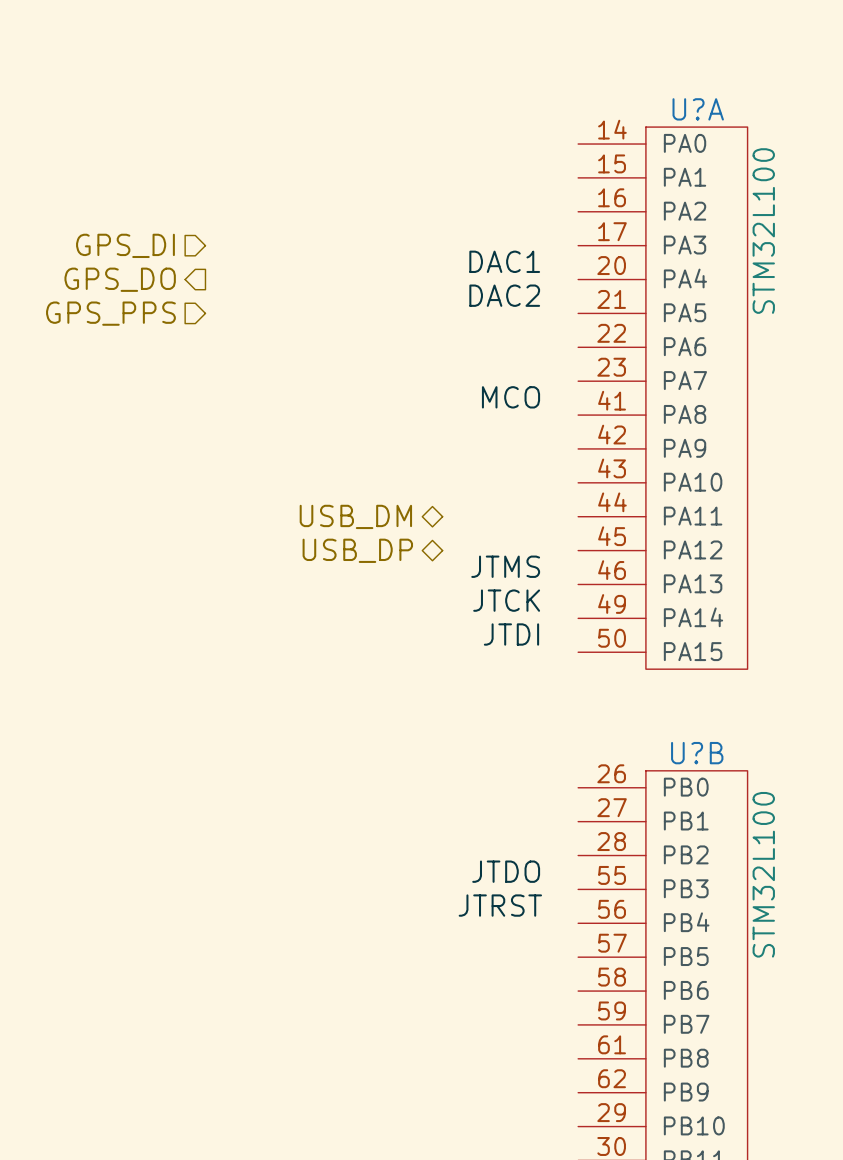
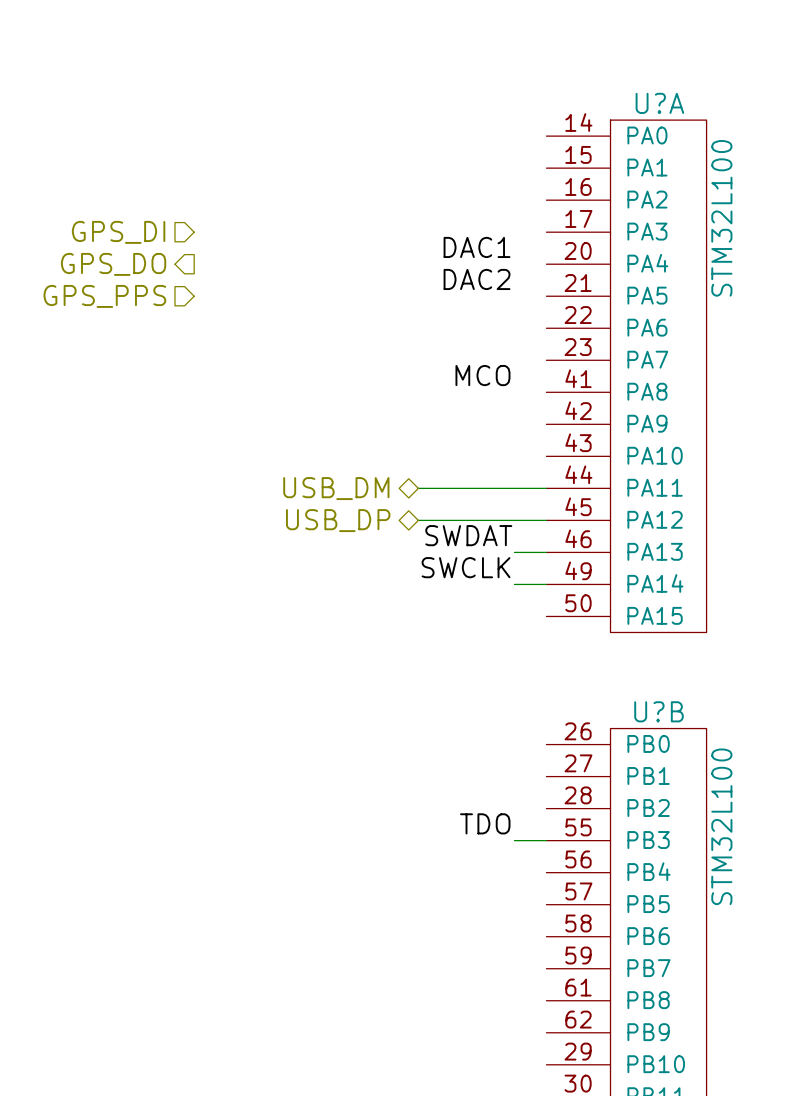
wire: none -> (418, 488) (546, 488)
wire: none -> (418, 520) (546, 520)
label: JTMS (505, 566) -> SWDAT (468, 535)
wire: none -> (514, 552) (546, 552)
label: JTCK (506, 600) -> SWCLK (466, 567)
wire: none -> (514, 584) (546, 584)
label: JTDI (511, 634) -> none
label: JTDO (506, 871) -> TDO (485, 823)
wire: none -> (514, 840) (546, 840)
label: JTRST (500, 905) -> none

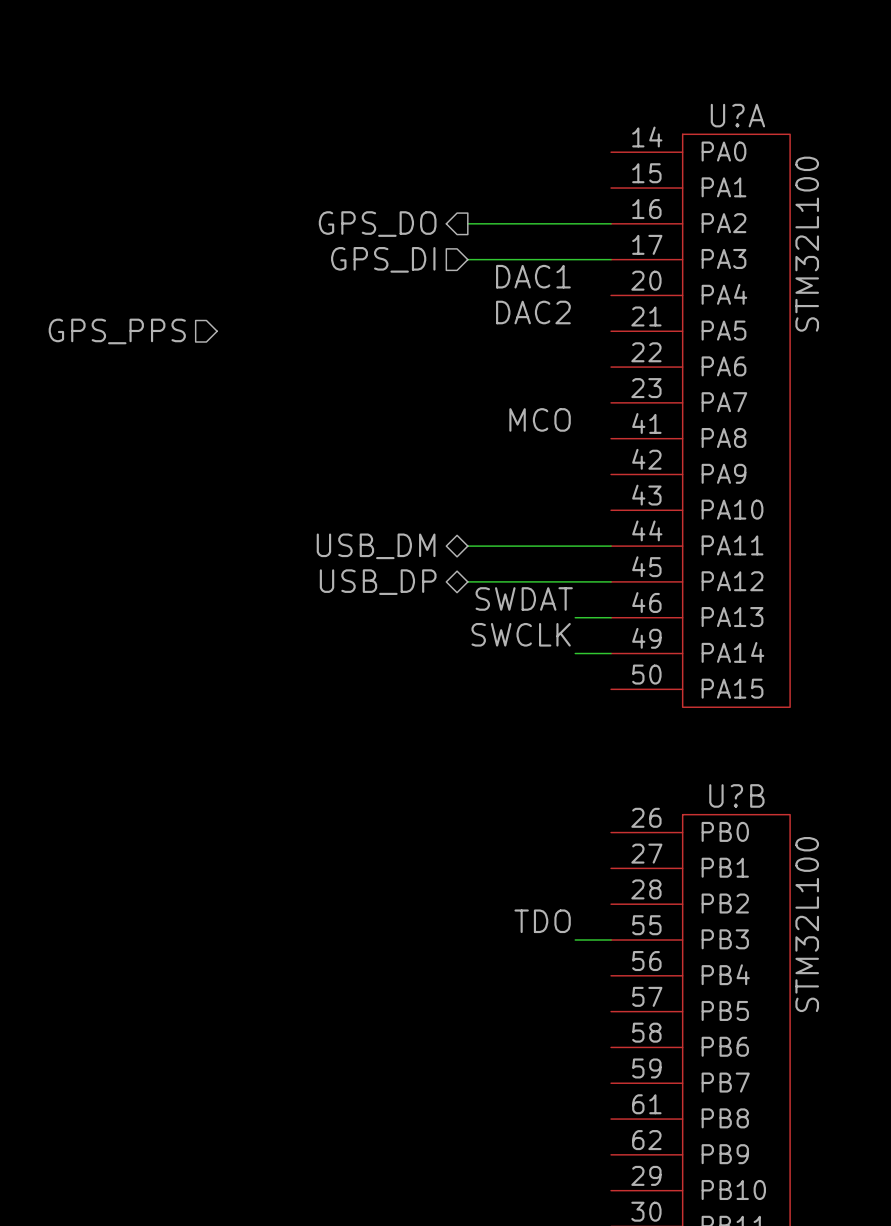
wire: none -> (467, 223) (611, 223)
hierarchical label position: GPS_DI (118, 232) -> GPS_DI (383, 259)
wire: none -> (467, 259) (611, 259)
hierarchical label position: GPS_DO (113, 264) -> GPS_DO (377, 224)

